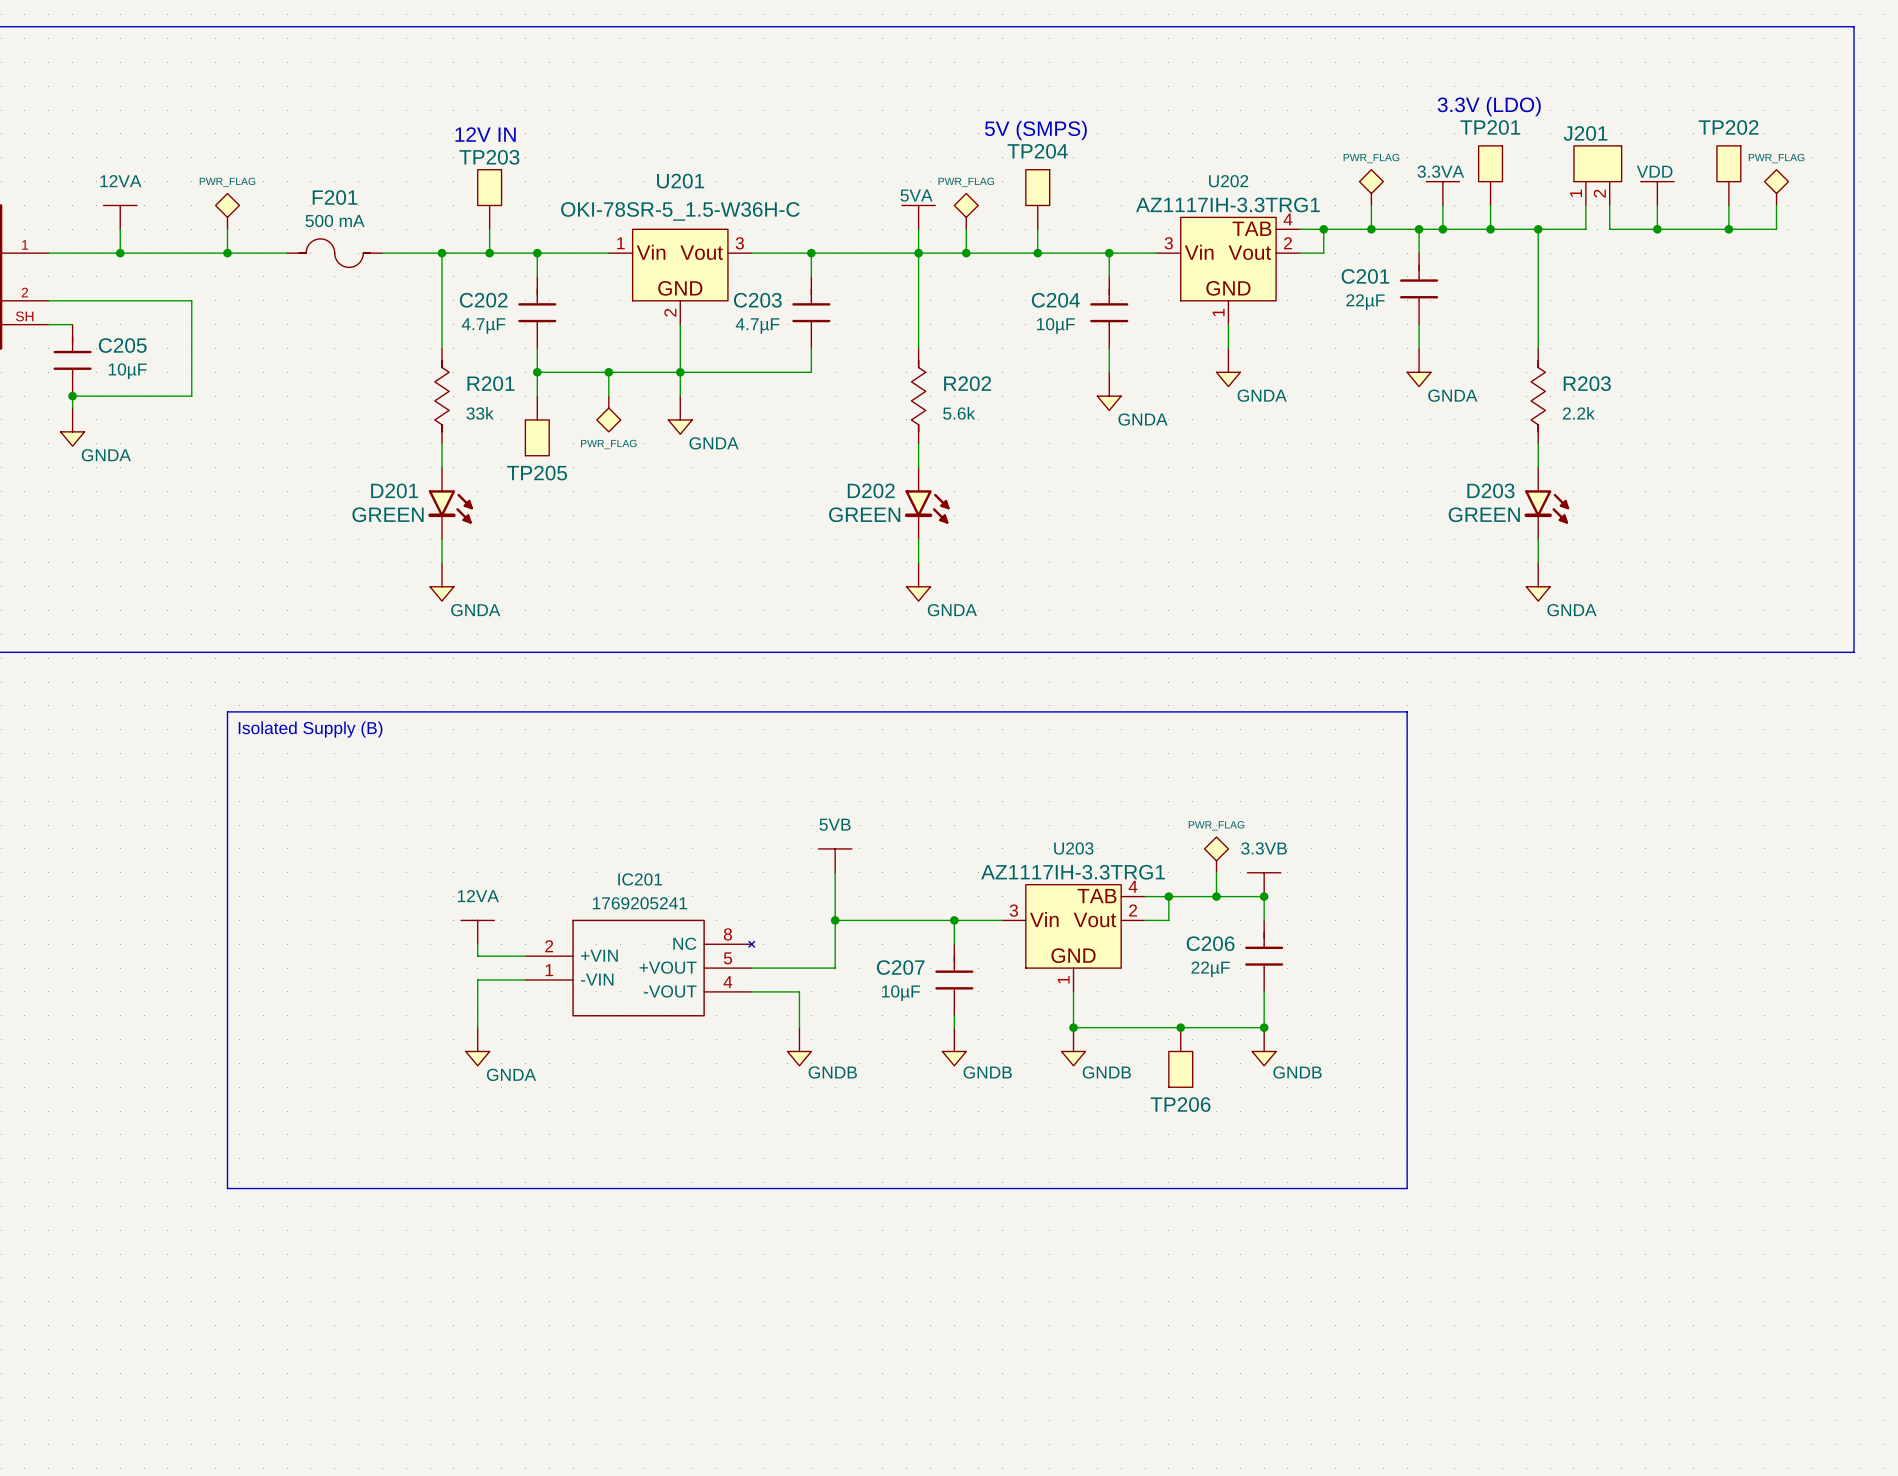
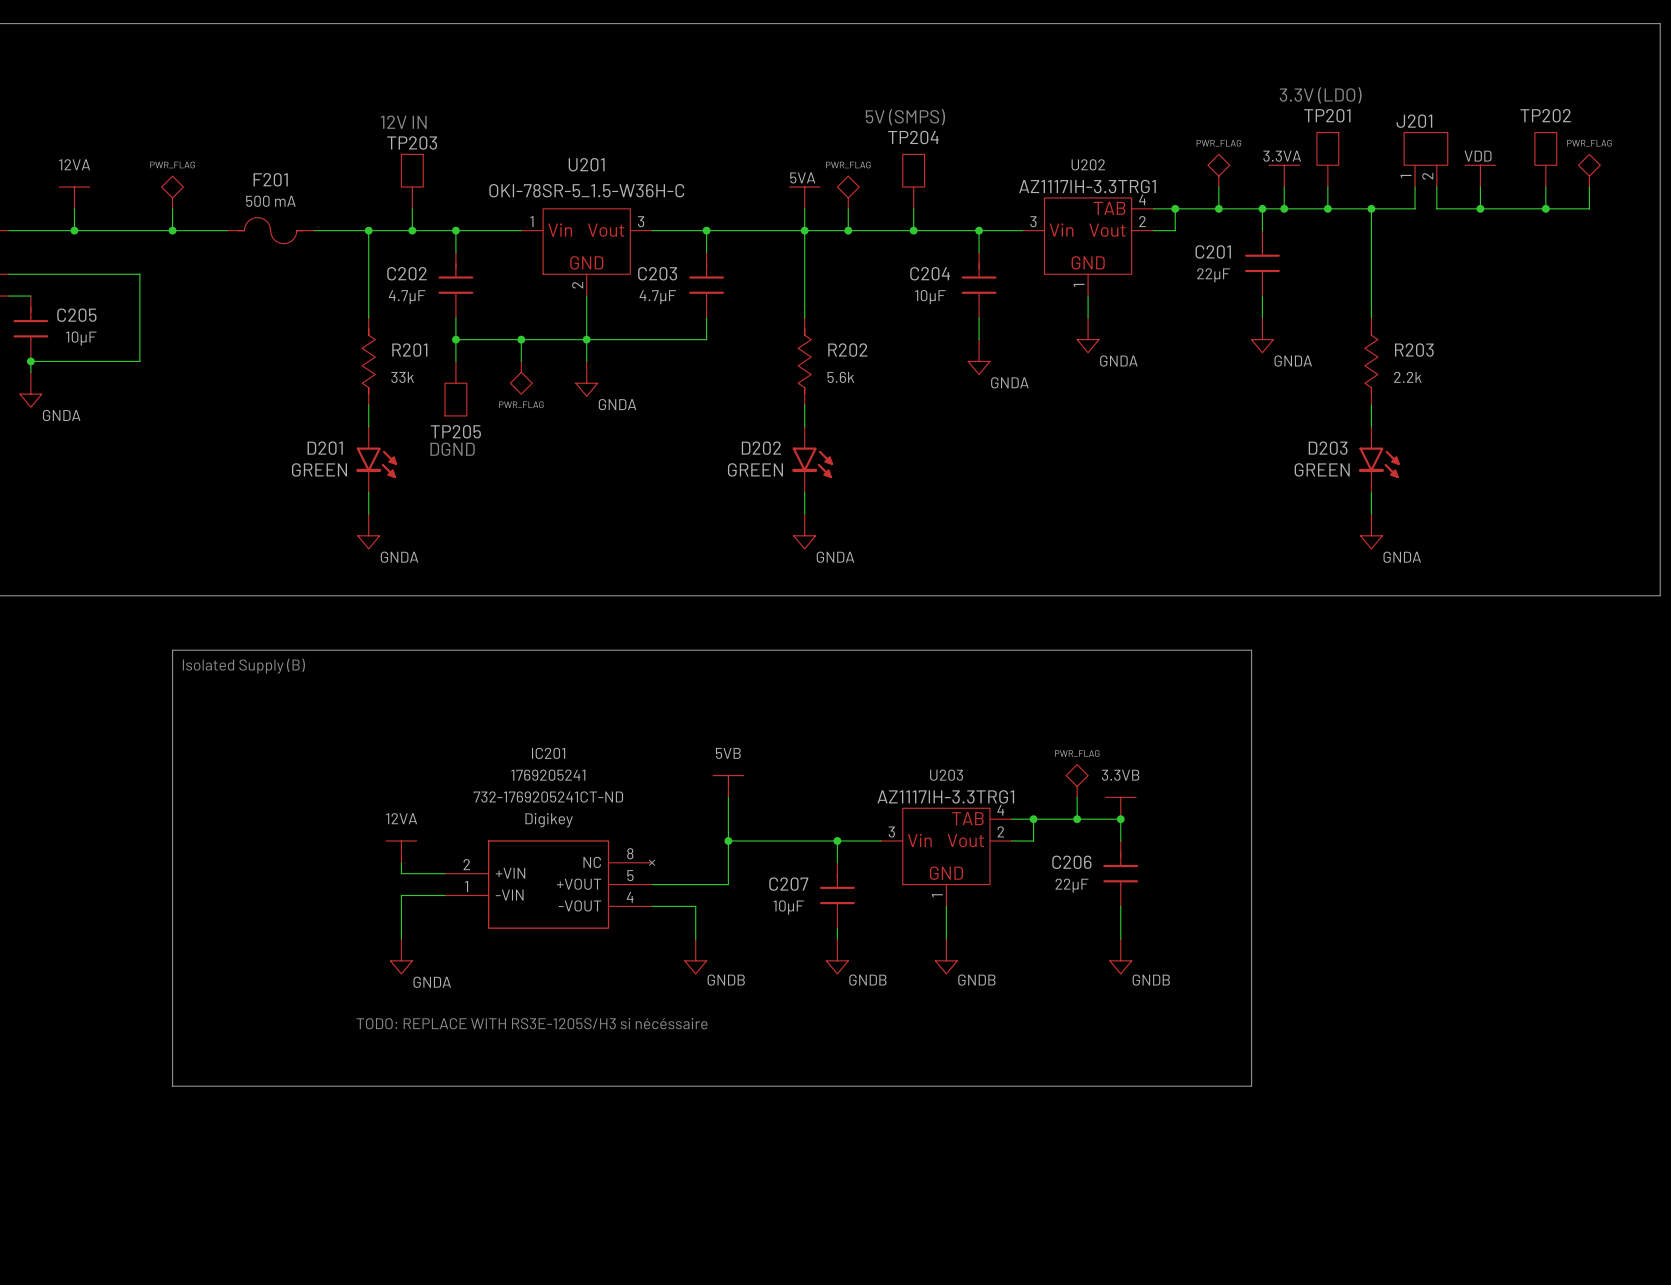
text: none -> DGND (452, 449)
IC201 text: none -> 732-1769205241CT-ND (548, 796)
IC201 name position: IC201 (640, 879) -> IC201 (548, 753)
IC201 text: none -> Digikey (549, 820)
IC201 value position: 1769205241 (640, 903) -> 1769205241 (548, 775)
wire: (1073, 1027) (1264, 1027) -> none
junction: (1073, 1027) -> none
junction: (1180, 1027) -> none
junction: (1264, 1027) -> none
TP206: (1180, 1057) -> none
text: none -> TODO: REPLACE WITH RS3E-1205S/H3 si nécéssaire (532, 1023)

